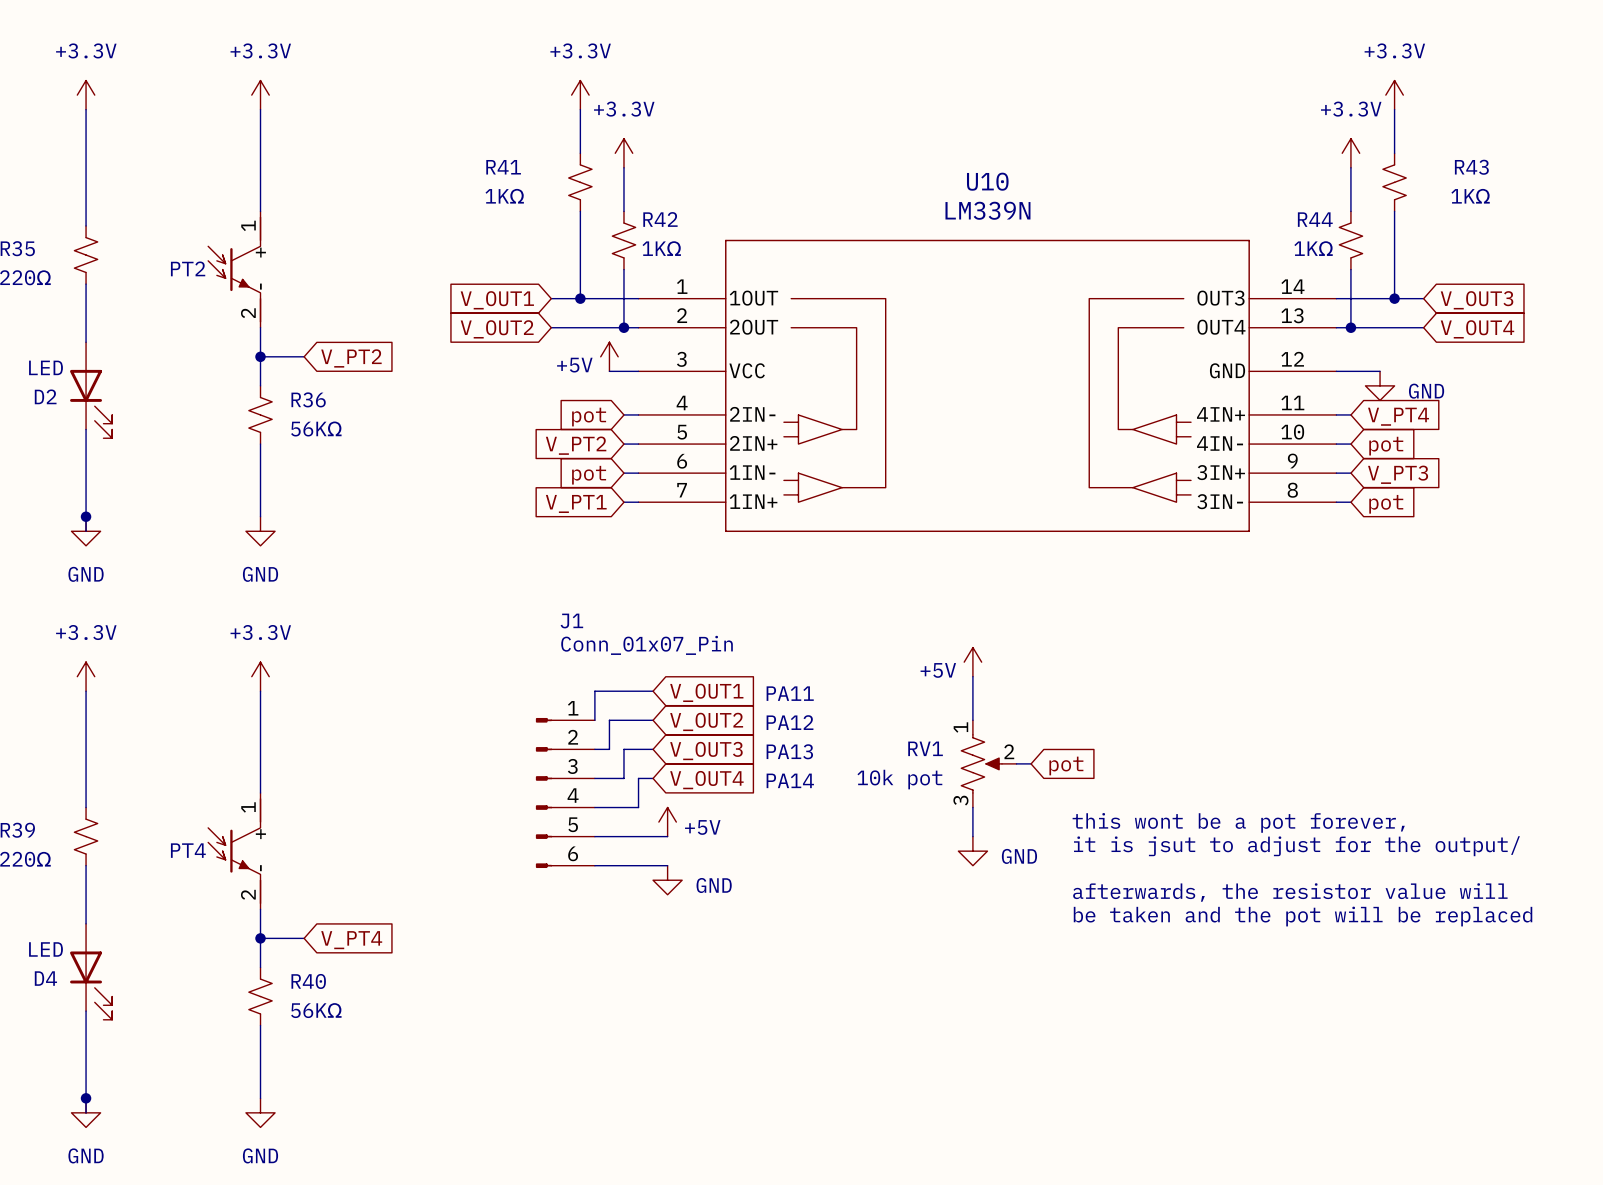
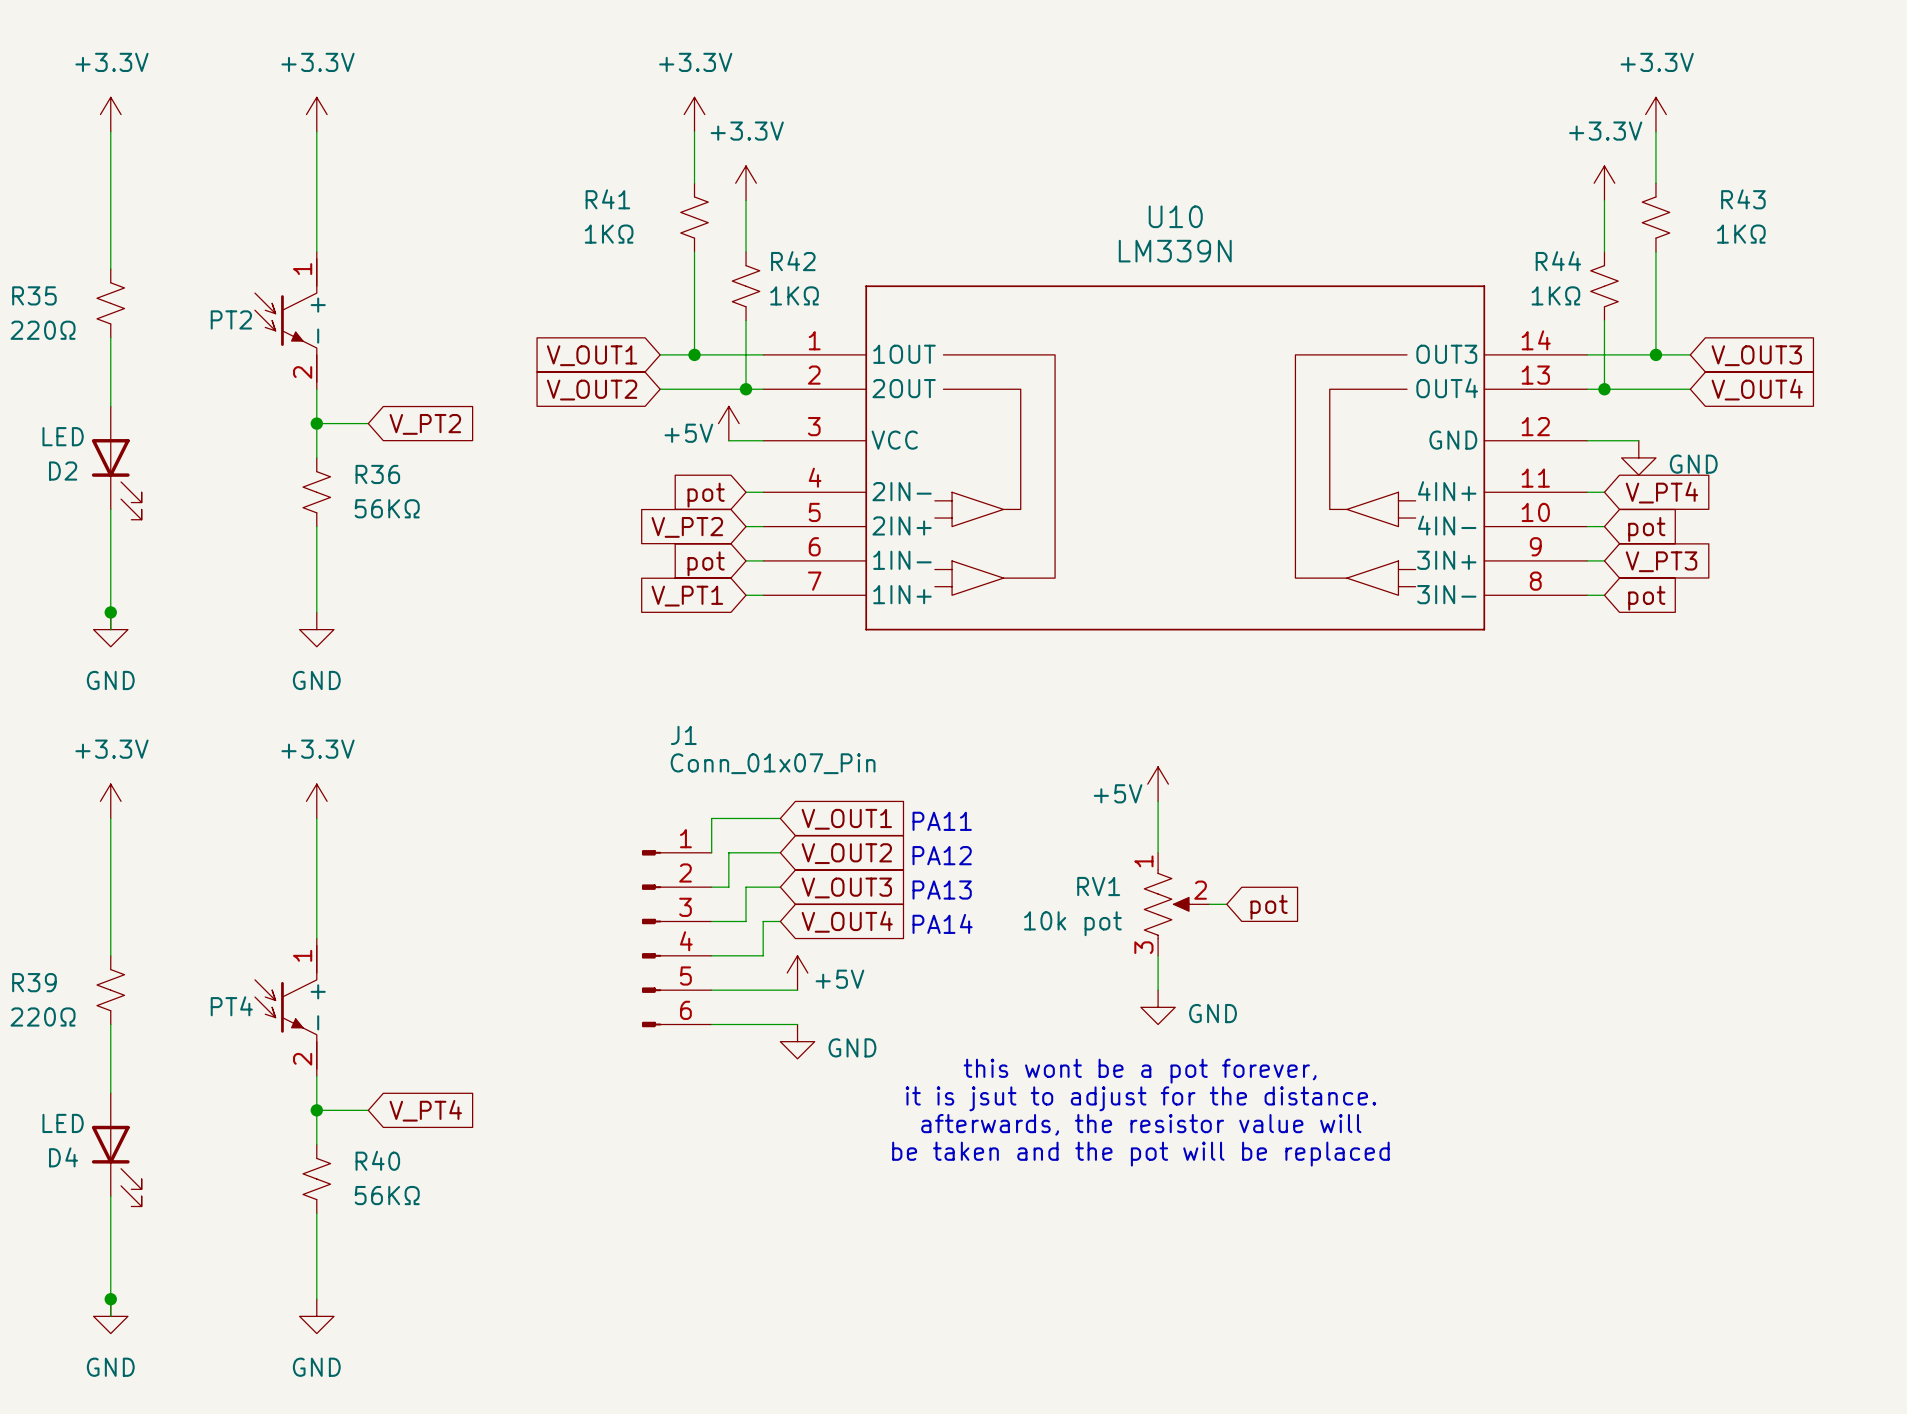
text position: this wont be a pot forever, (1238, 822) -> this wont be a pot forever, (1140, 1071)
text: it is jsut to adjust for the output/ (1296, 846) -> none
text position: afterwards, the resistor value will (1290, 892) -> afterwards, the resistor value will (1141, 1124)
text position: be taken and the pot will be replaced (1303, 916) -> be taken and the pot will be replaced (1140, 1154)
text: none -> it is jsut to adjust for the distance. (1140, 1098)

